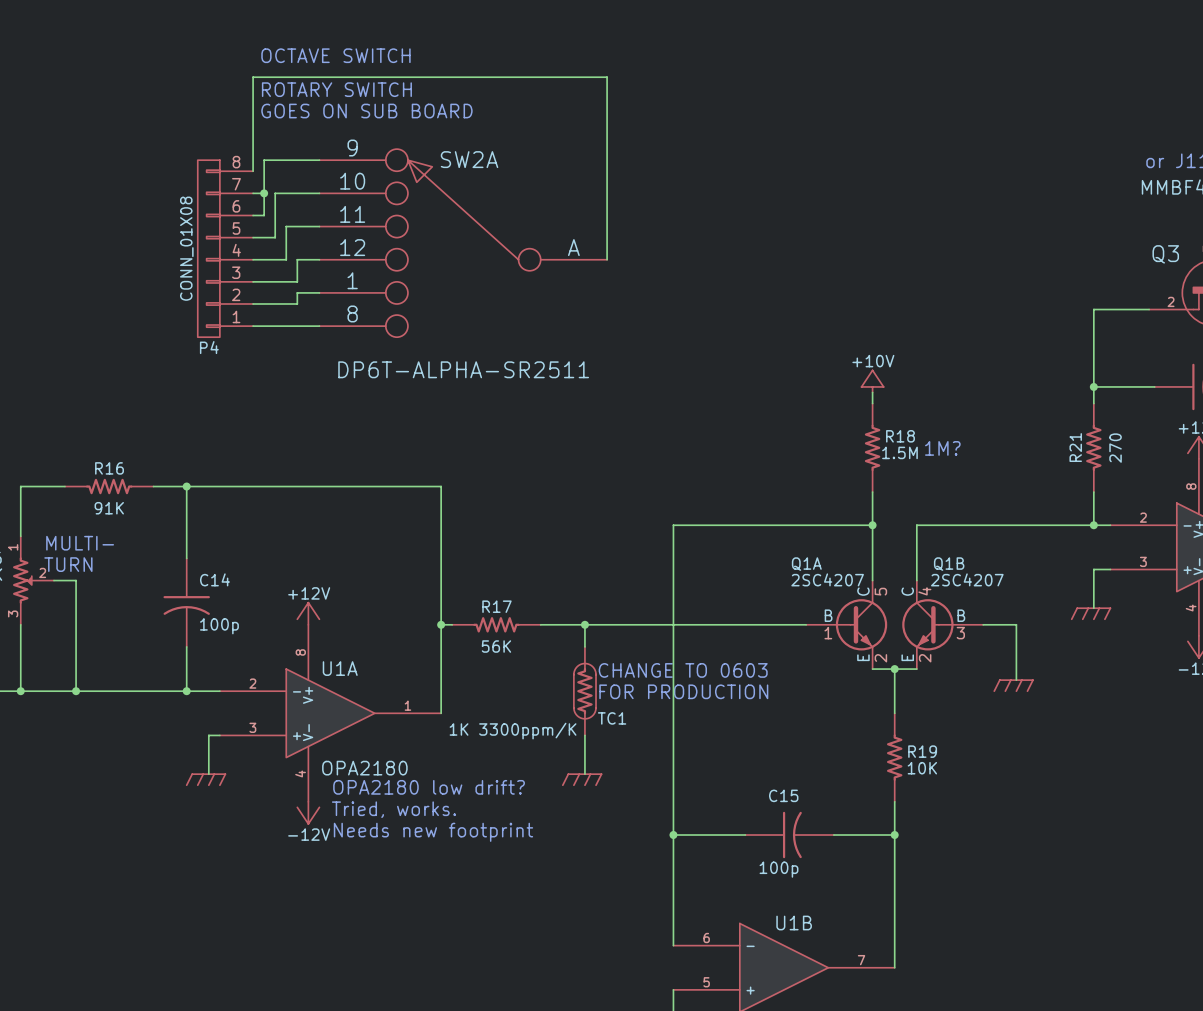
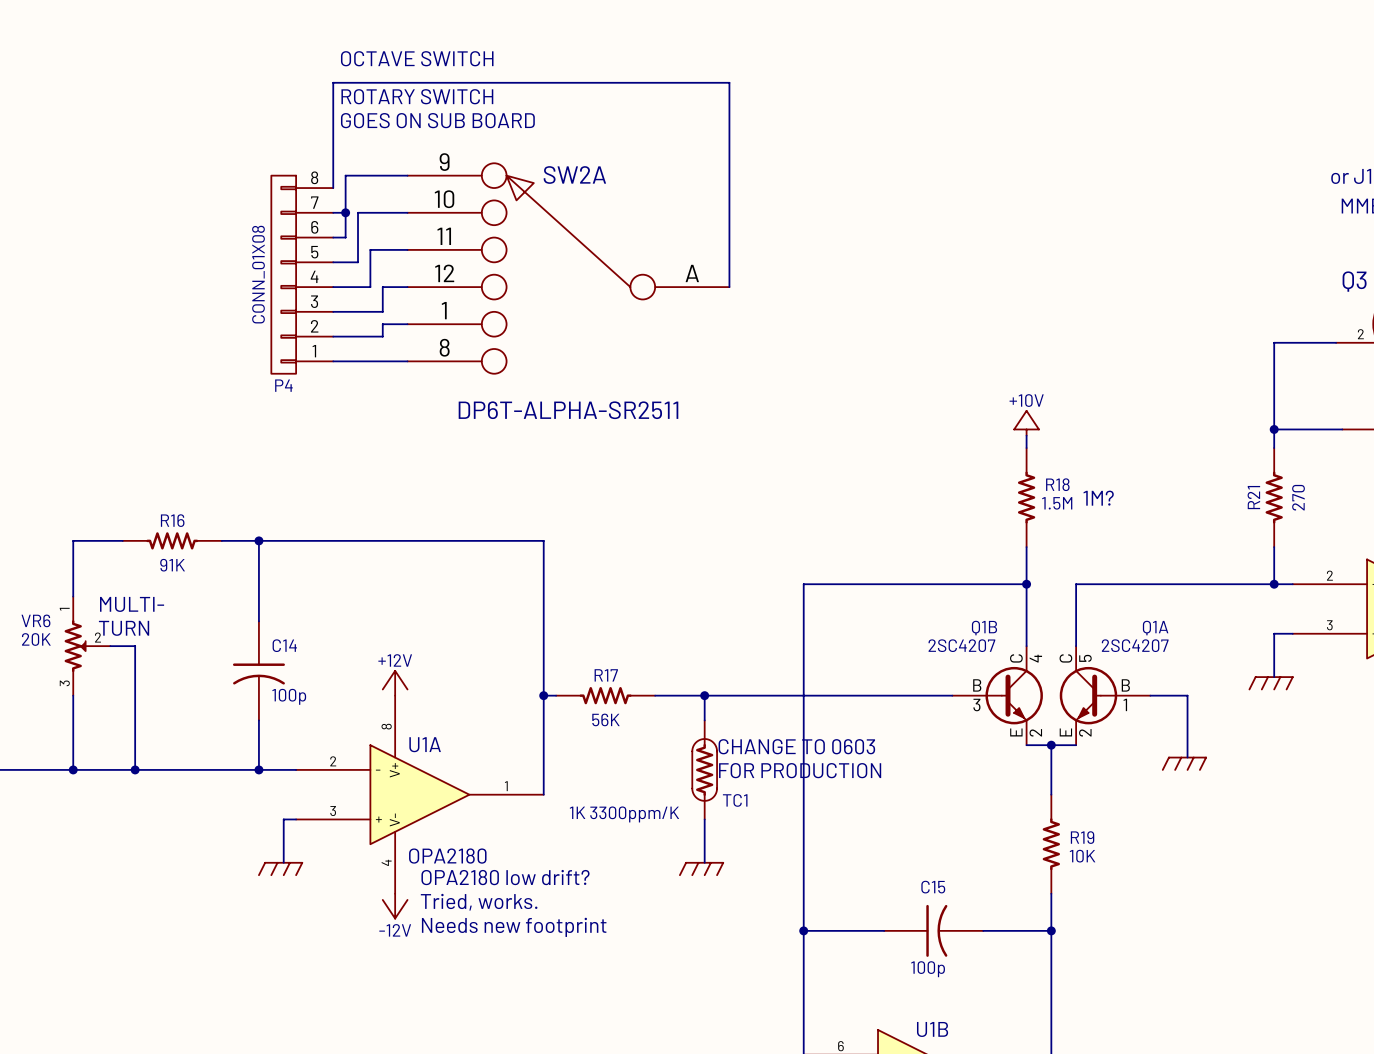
Q1A position: (846, 624) -> (1105, 695)
Q1A flip: as is (861, 624) -> left-right (1088, 695)
Q1B flip: as is (927, 624) -> left-right (1014, 695)
Q1B position: (942, 624) -> (997, 695)

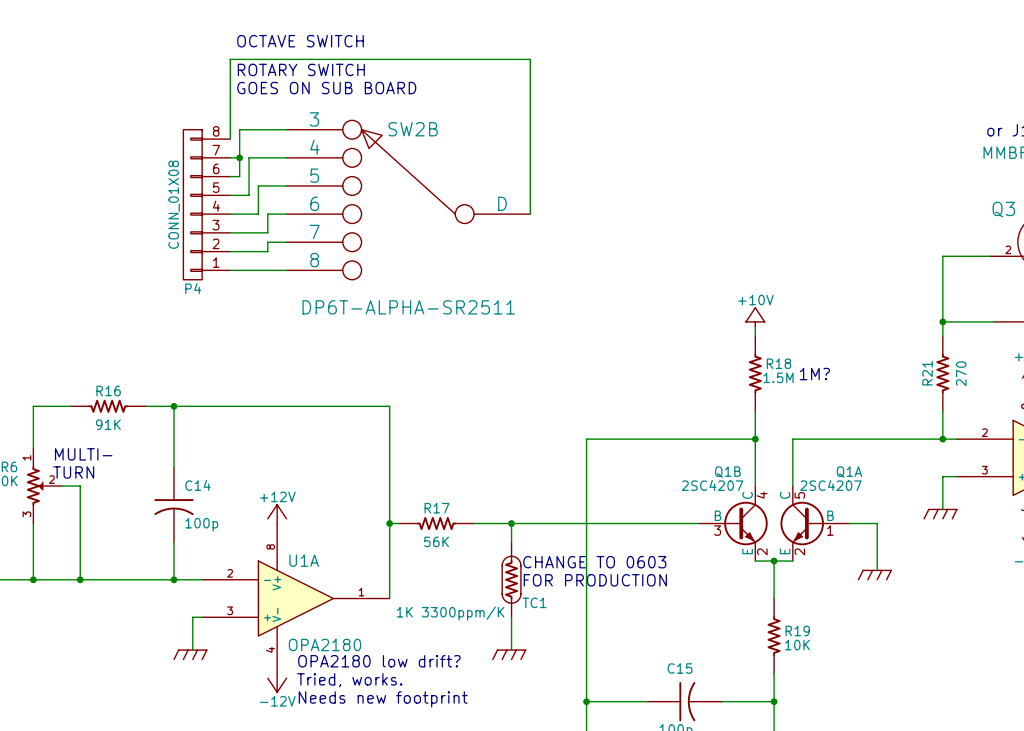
SW2A pin name: 9 (444, 162) -> 3 (314, 119)
SW2A name: SW2A (574, 175) -> SW2B (413, 129)
SW2A pin name: 10 (444, 199) -> 4 (314, 147)
SW2A pin name: 11 (444, 236) -> 5 (314, 175)
SW2A pin name: 12 (444, 273) -> 6 (314, 203)
SW2A pin name: A (692, 273) -> D (502, 203)
SW2A pin name: 1 (444, 310) -> 7 (314, 231)

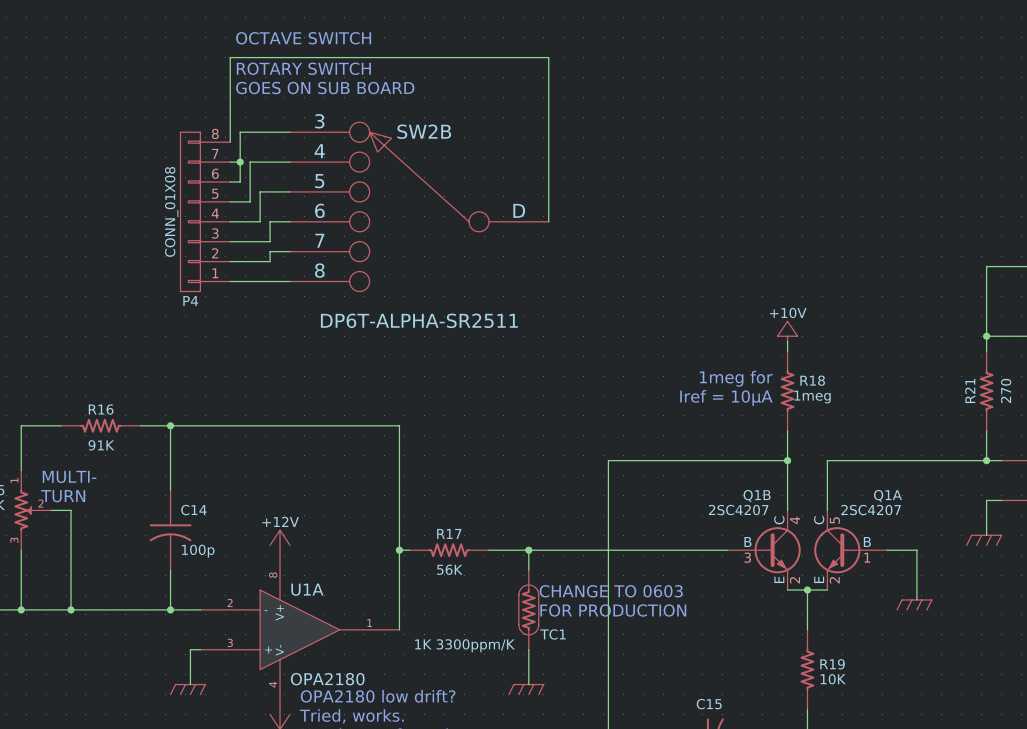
text: none -> 1meg for (736, 378)
text: 1M? (814, 374) -> none
R18 value: 1.5M (778, 377) -> 1meg (812, 397)
text: none -> Iref = 10µA (726, 397)

